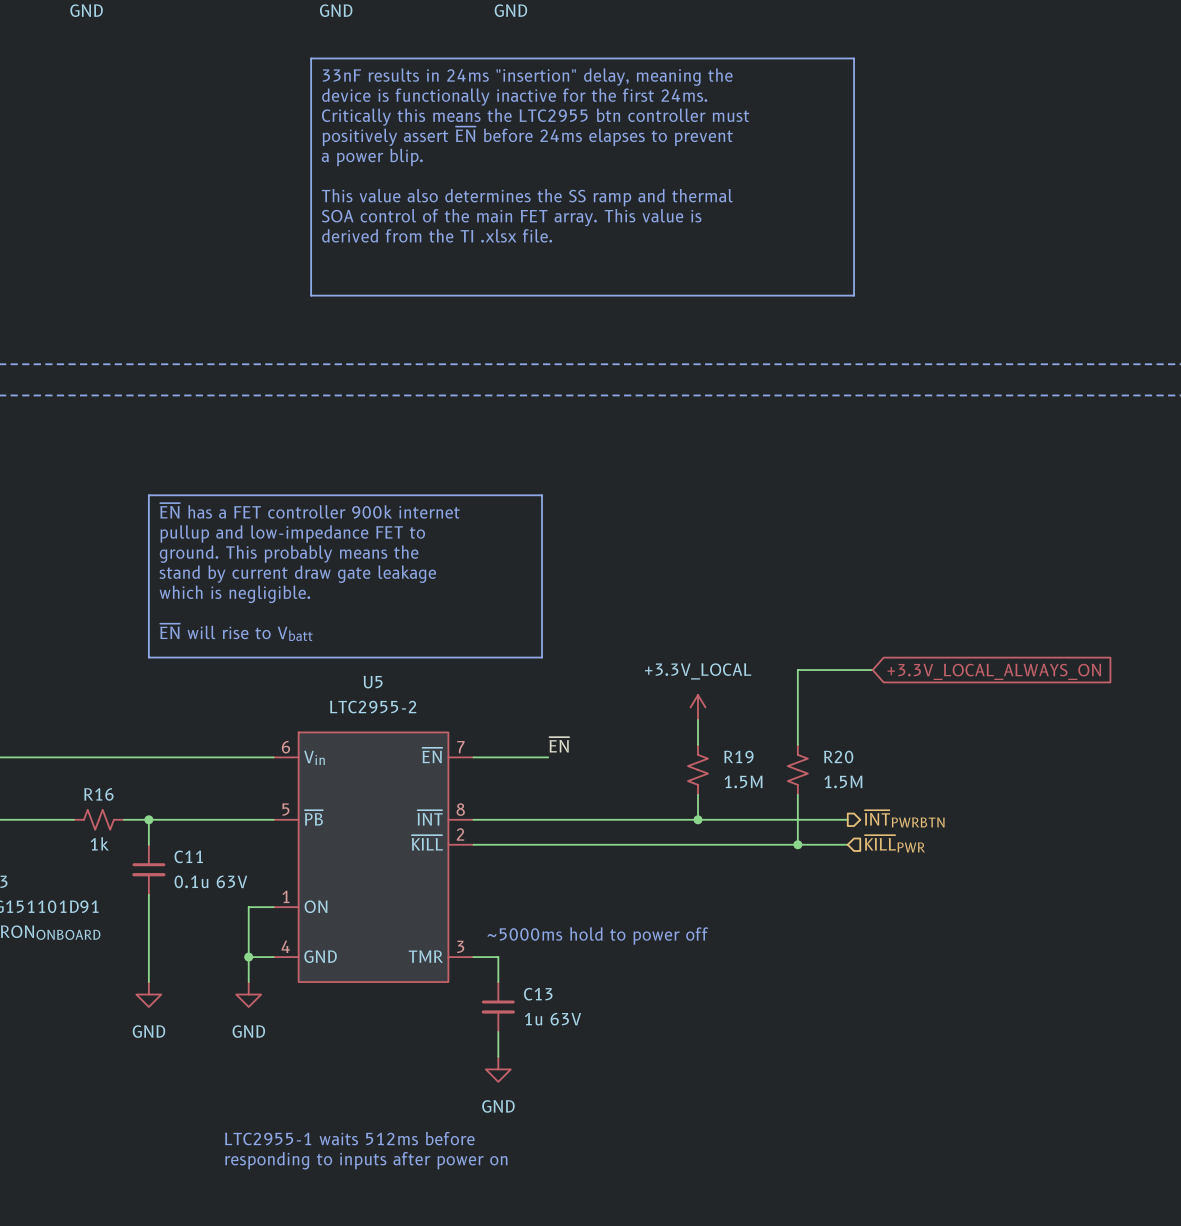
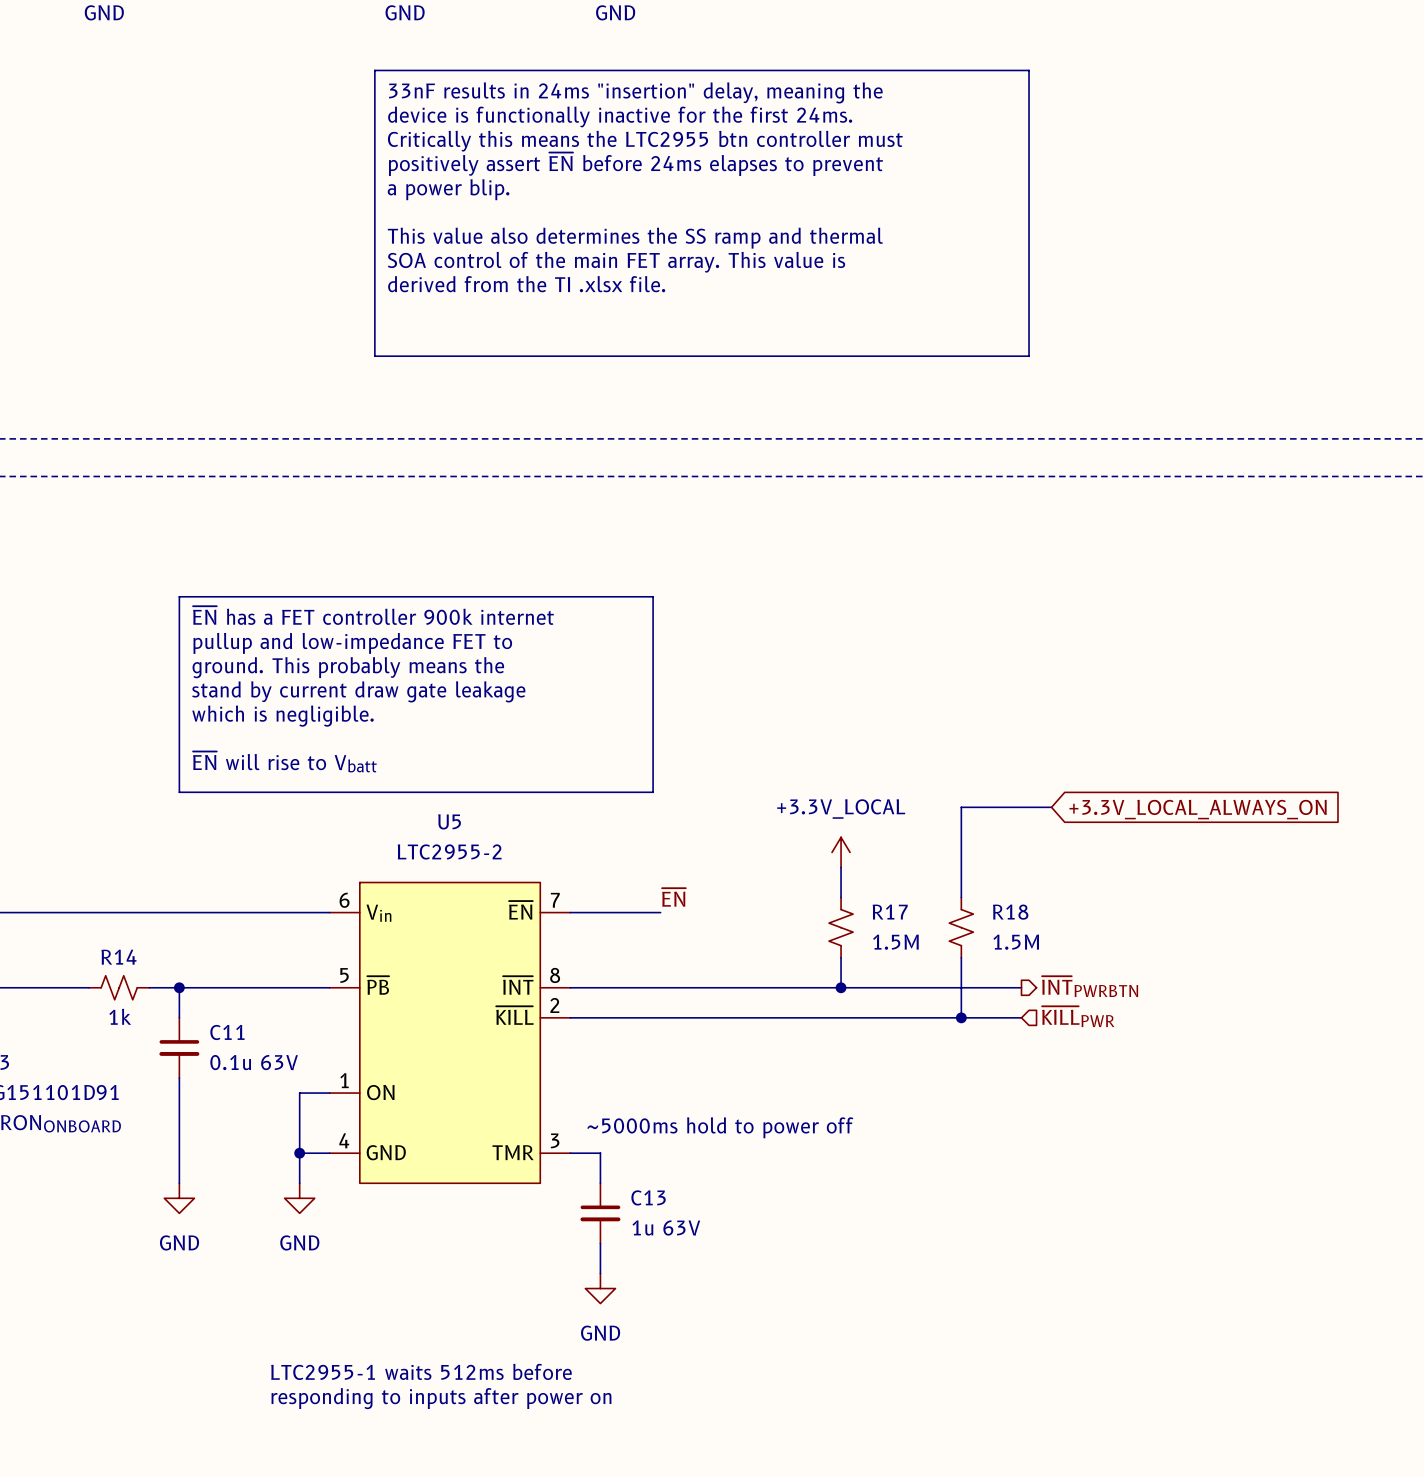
R19 name: R19 (738, 756) -> R17 (890, 912)
R20 name: R20 (838, 757) -> R18 (1010, 912)
R16 name: R16 (98, 794) -> R14 (119, 957)

